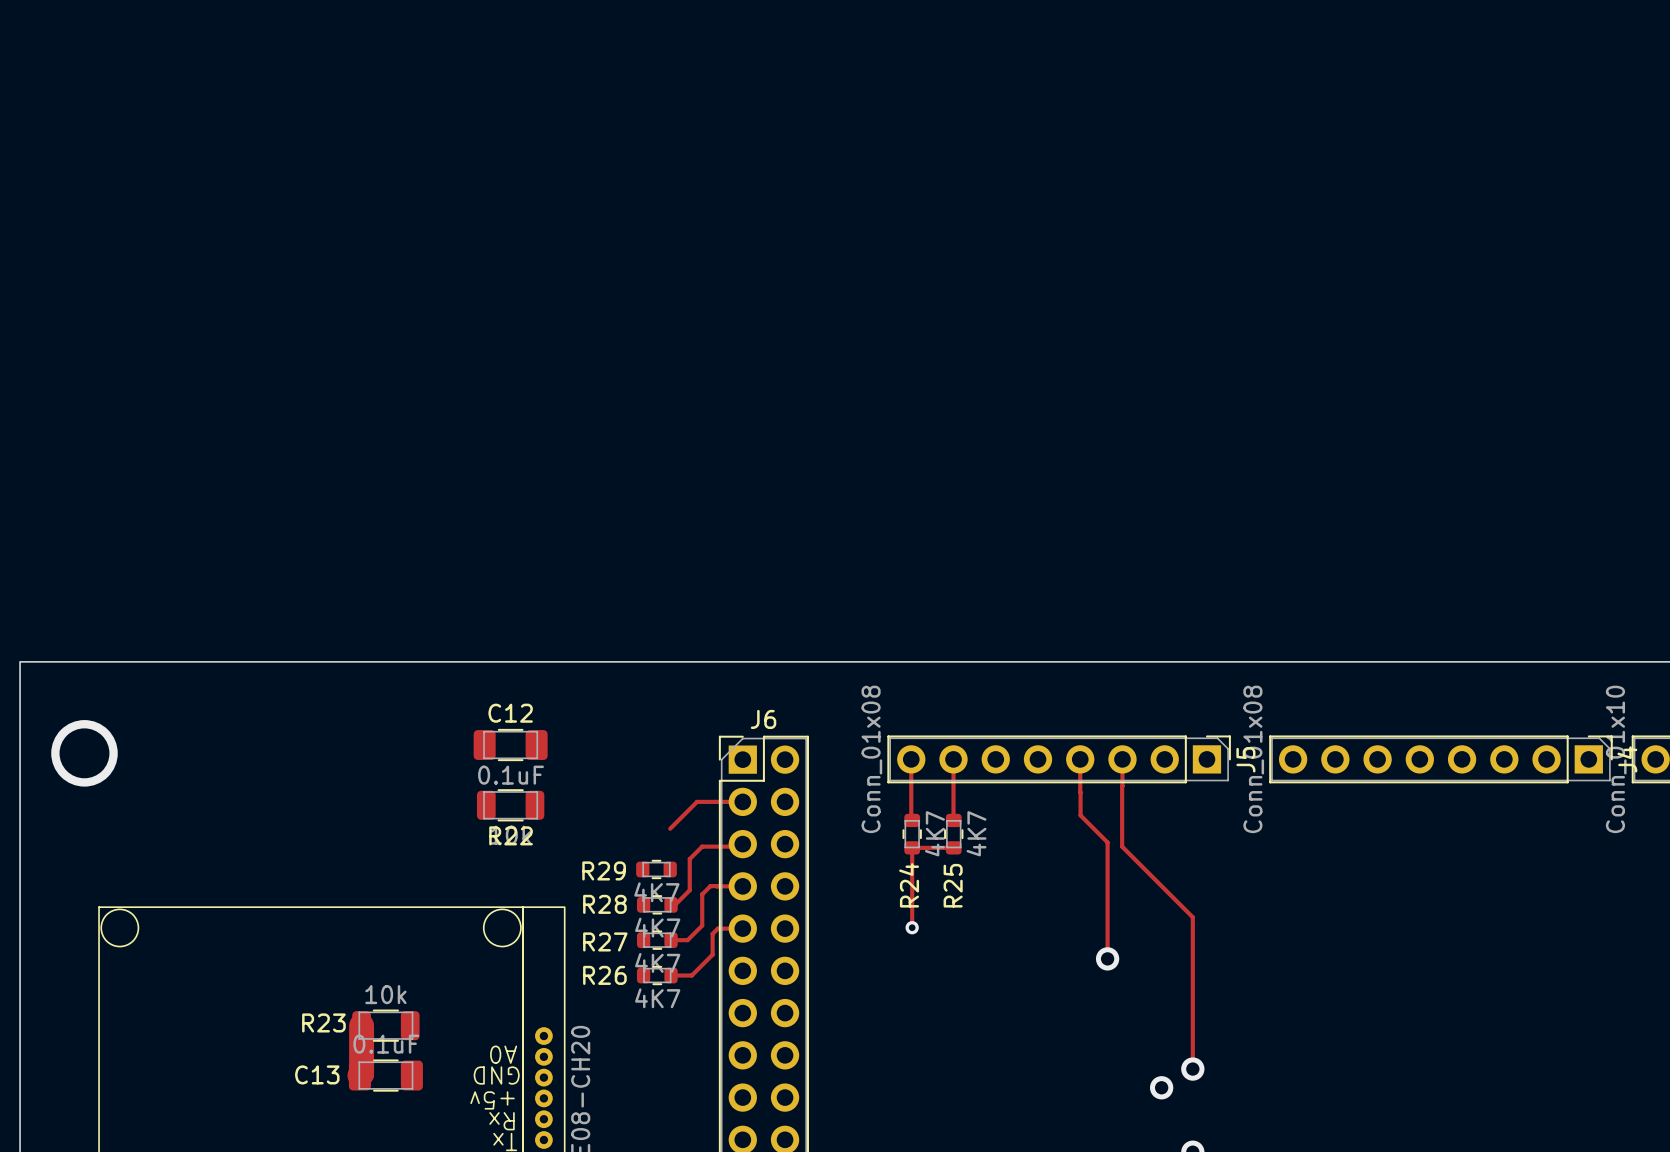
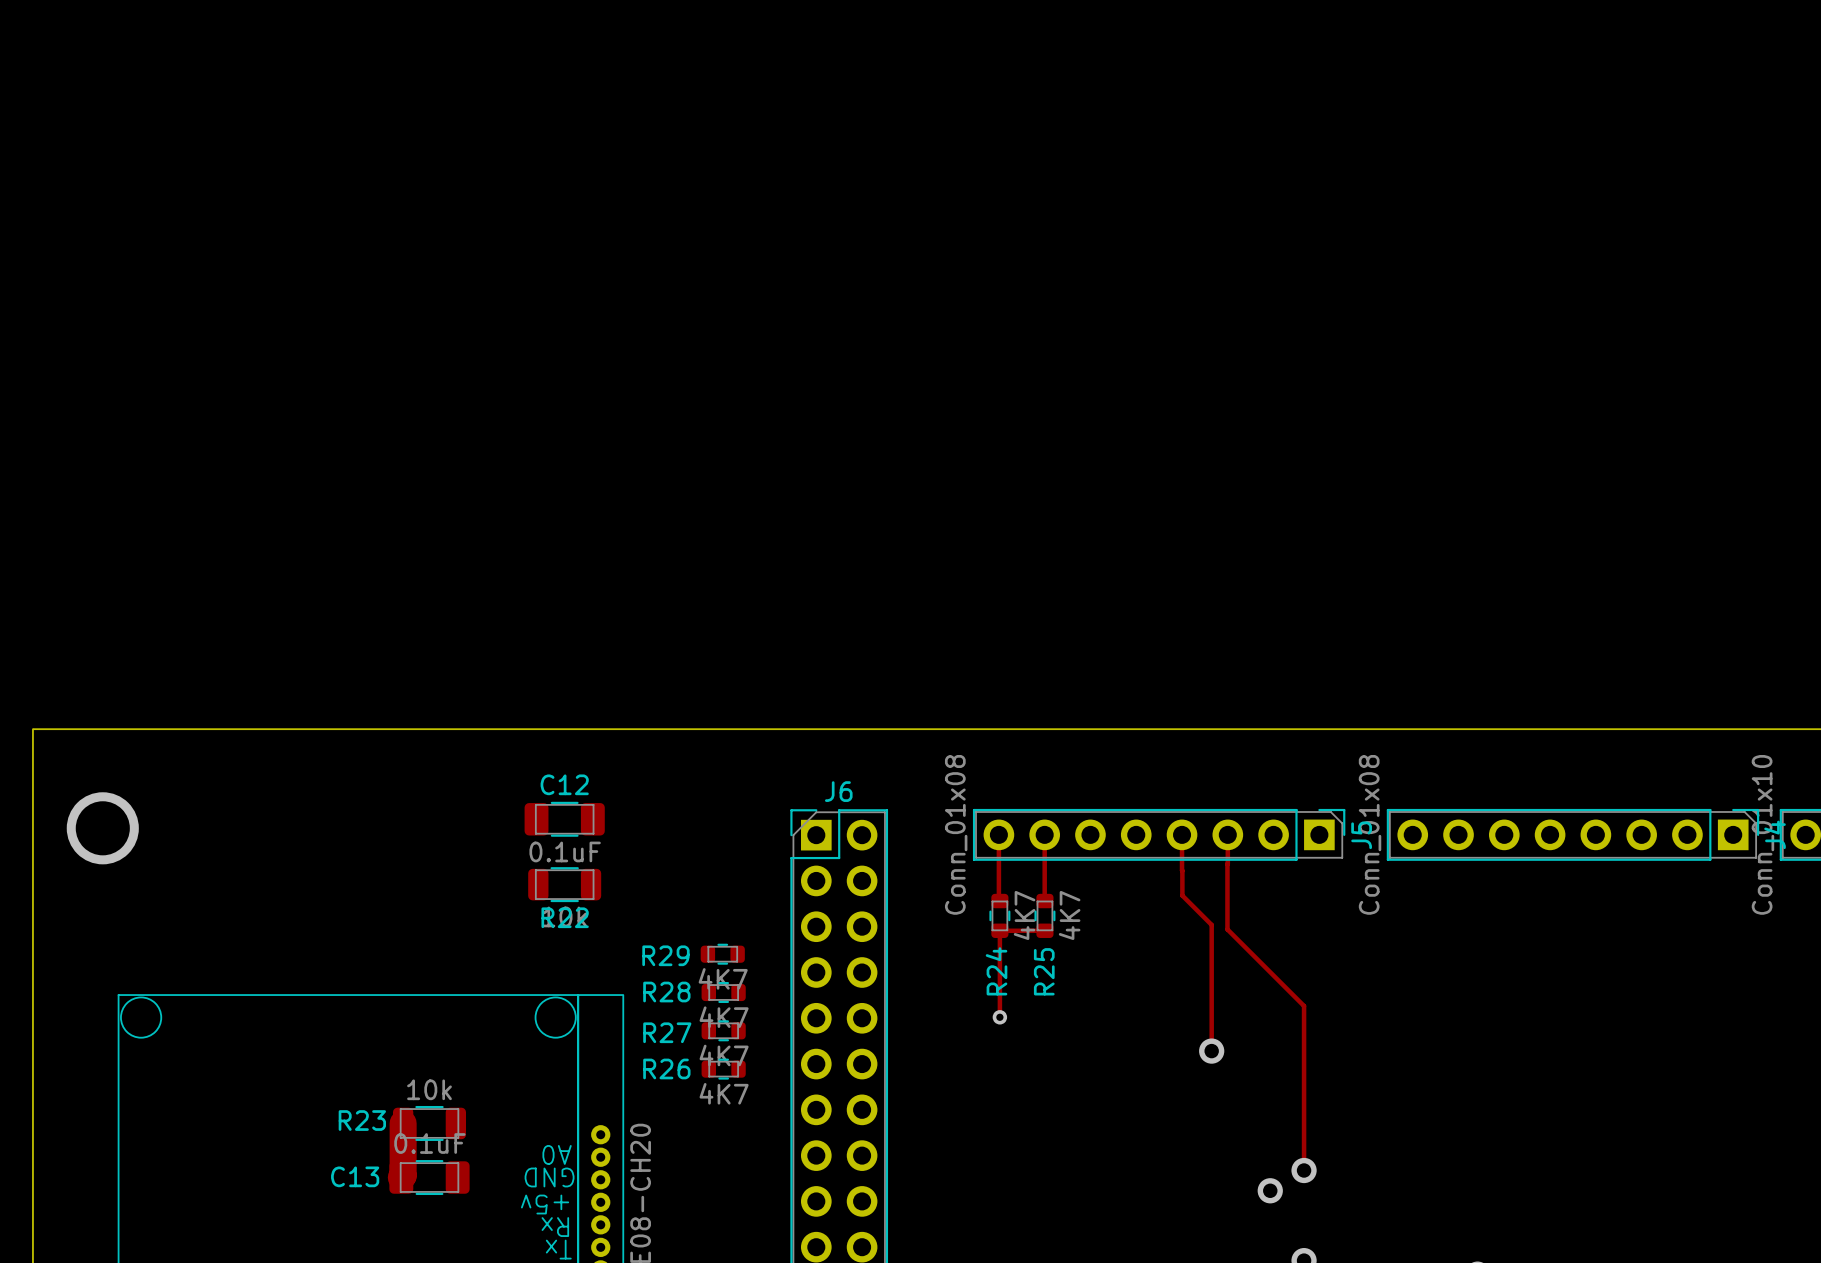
track: (742, 801) (697, 801) (670, 828) -> none
track: (742, 844) (740, 846) (702, 846) (689, 859) (689, 890) (675, 904) (671, 904) -> none
track: (742, 886) (710, 886) (702, 894) (702, 925) (687, 940) (671, 940) -> none
track: (742, 928) (717, 928) (712, 933) (712, 954) (691, 975) (671, 975) -> none

